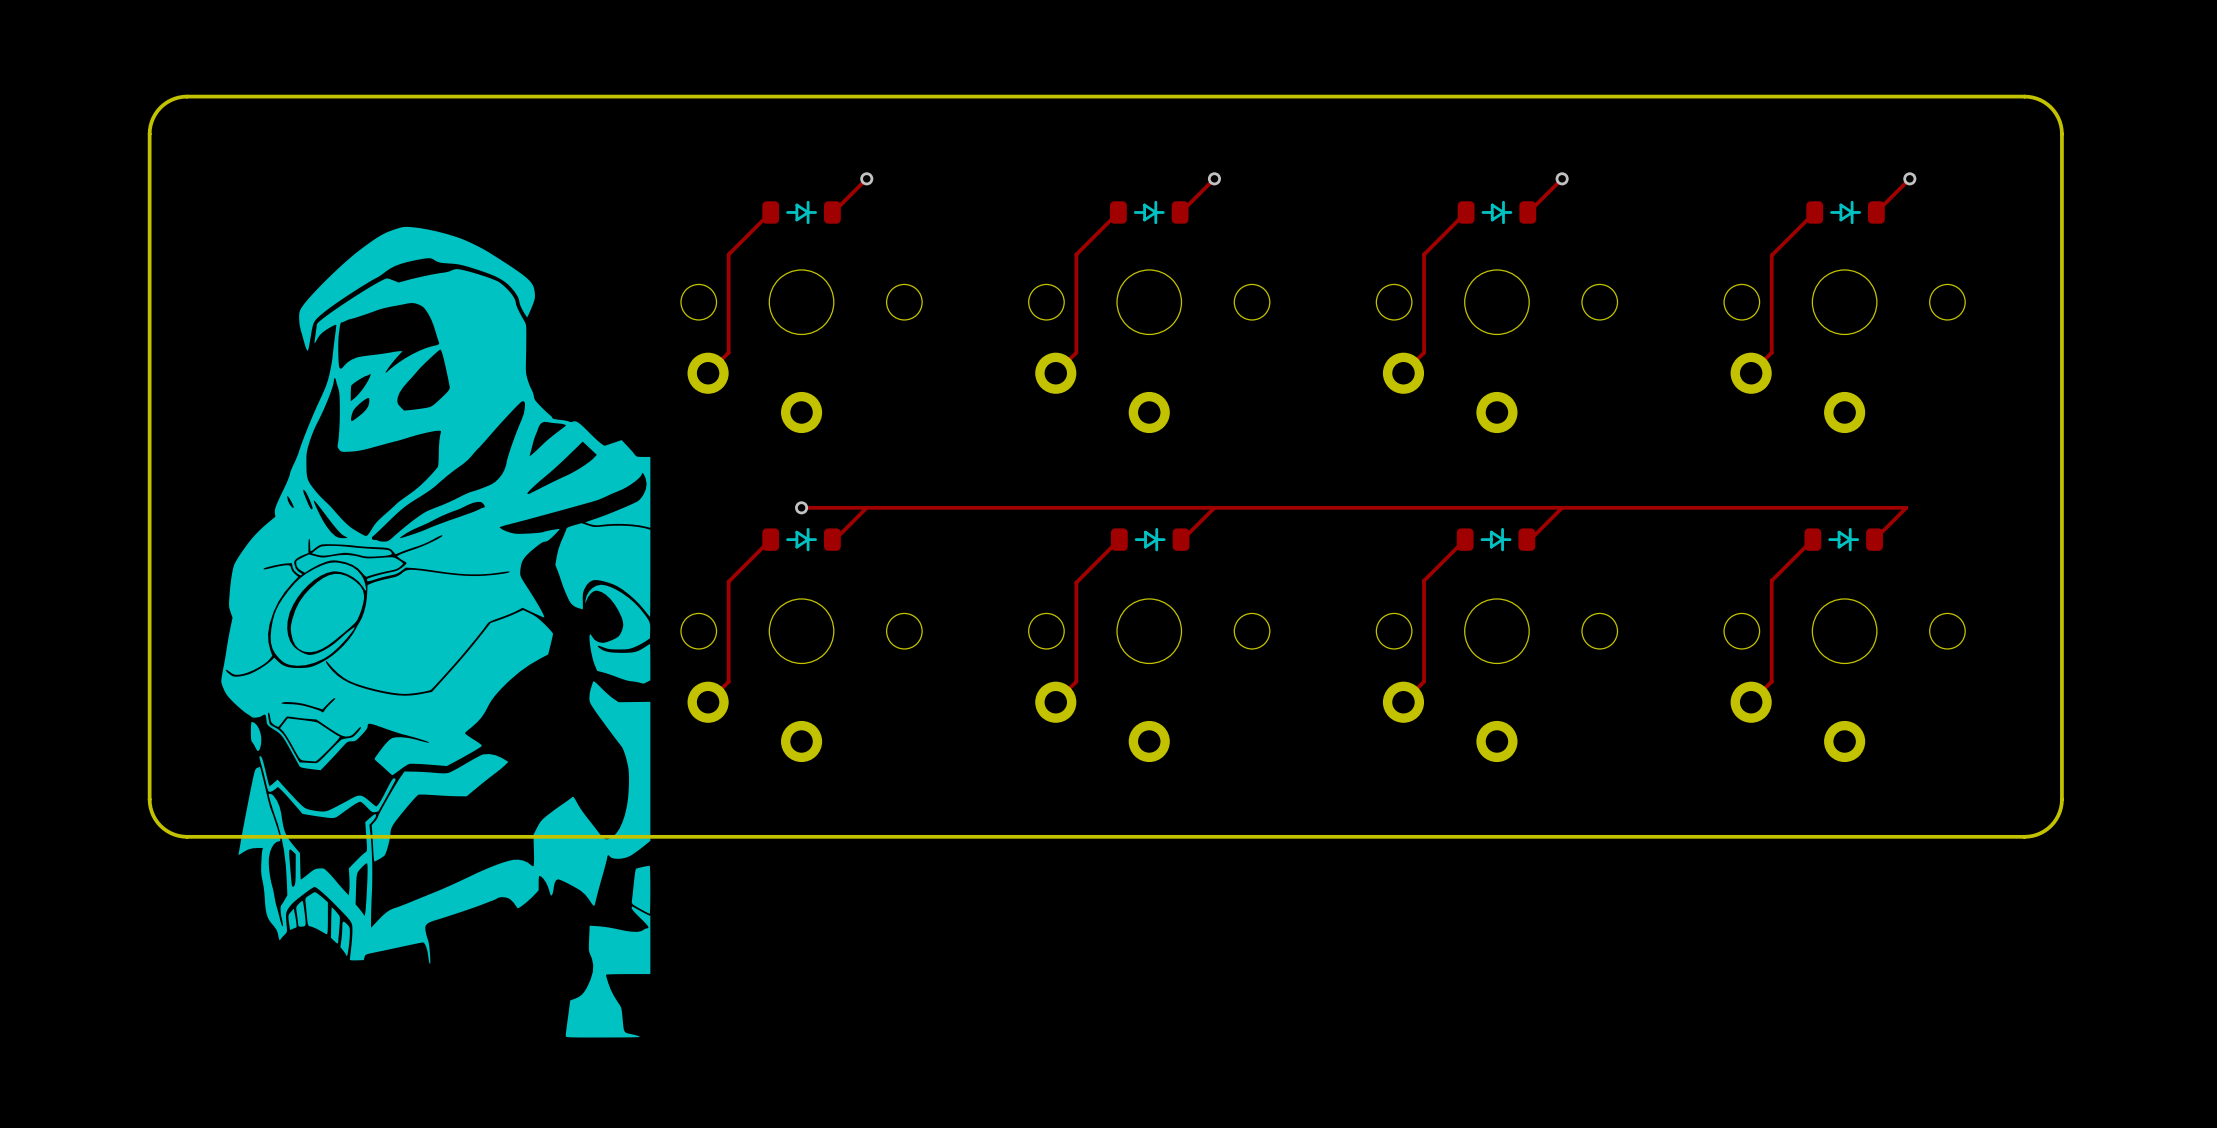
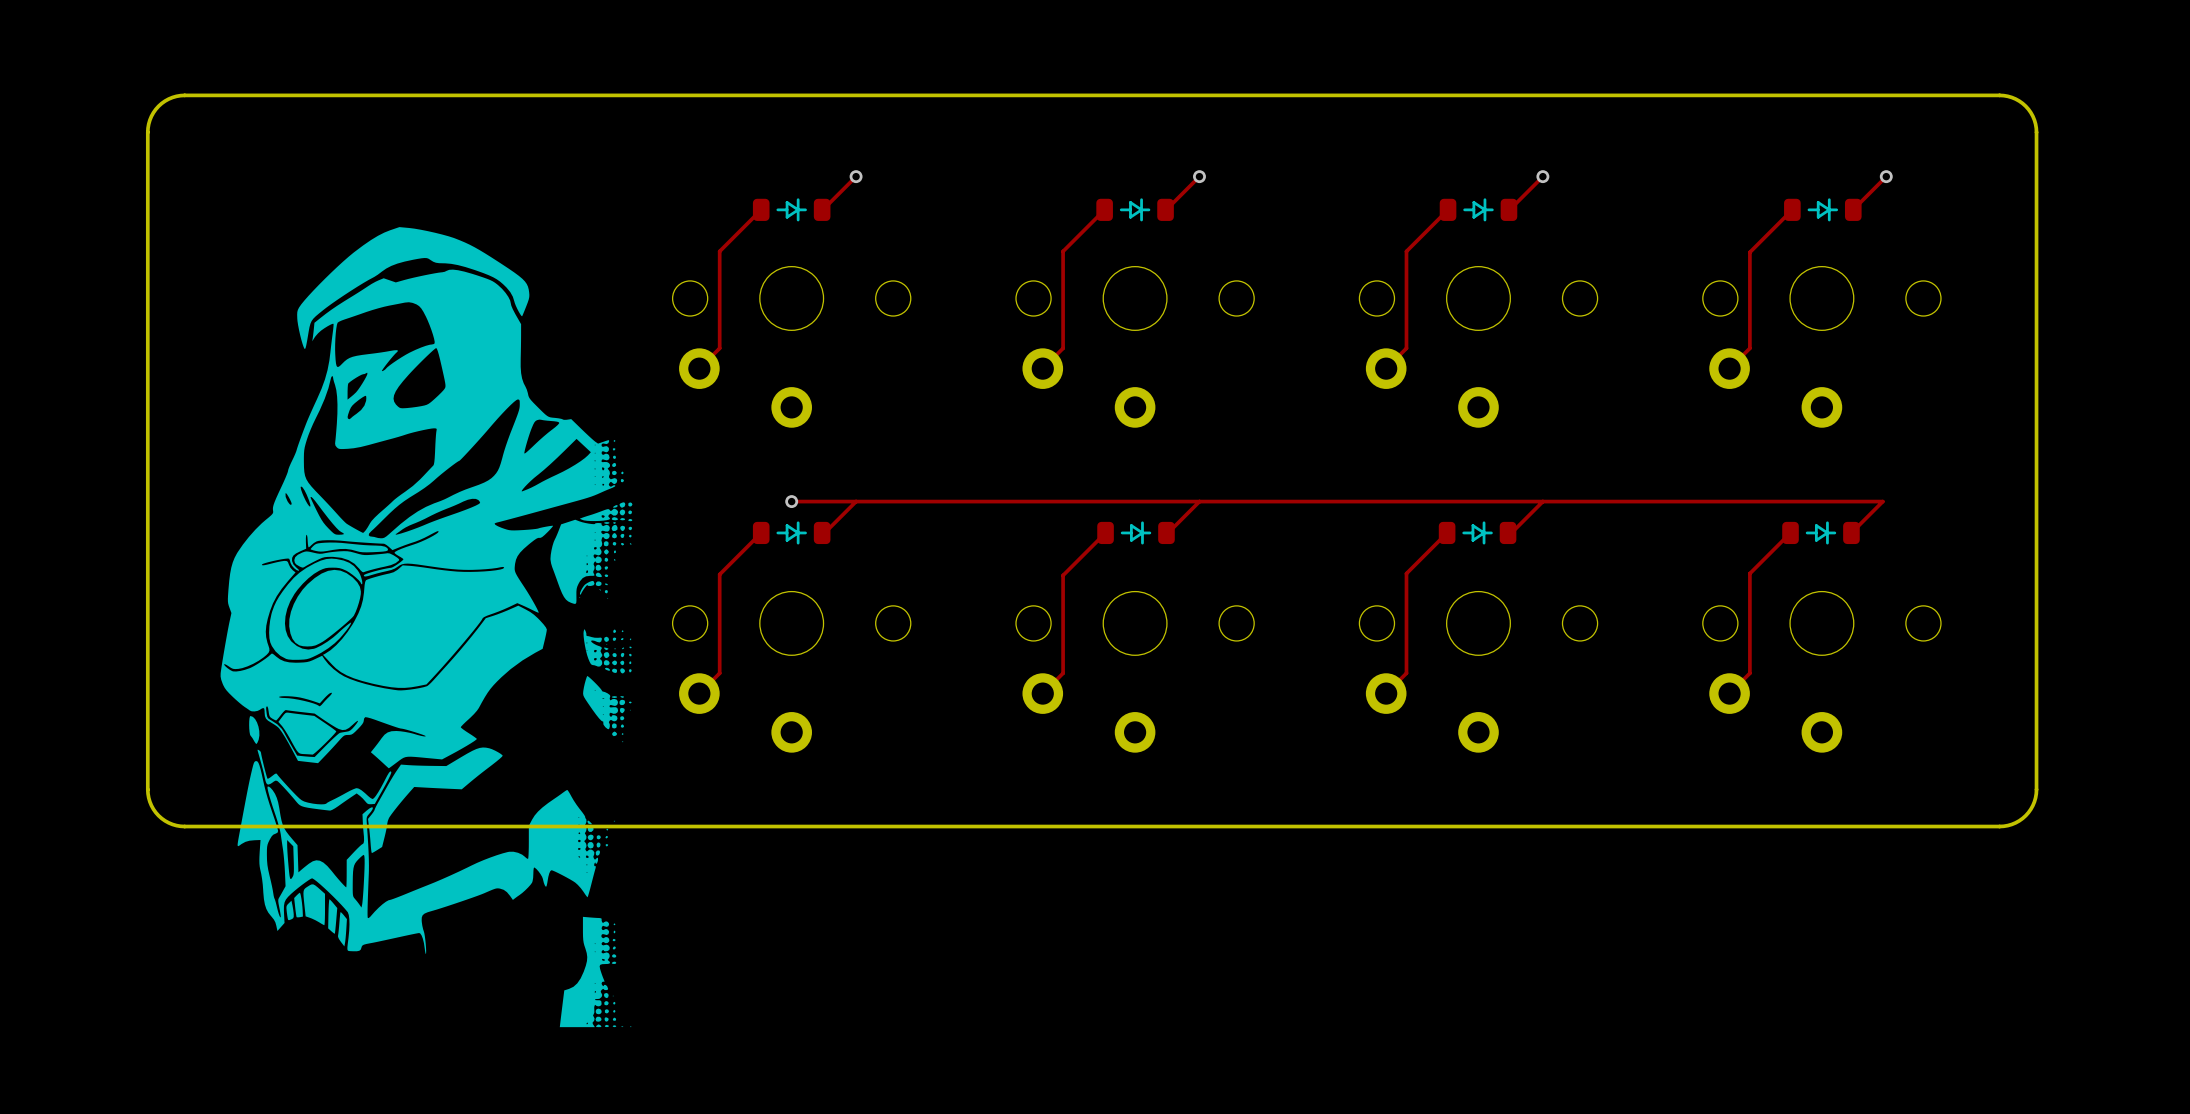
drawing shape: [221, 226, 651, 1038] -> [220, 227, 633, 1028]

